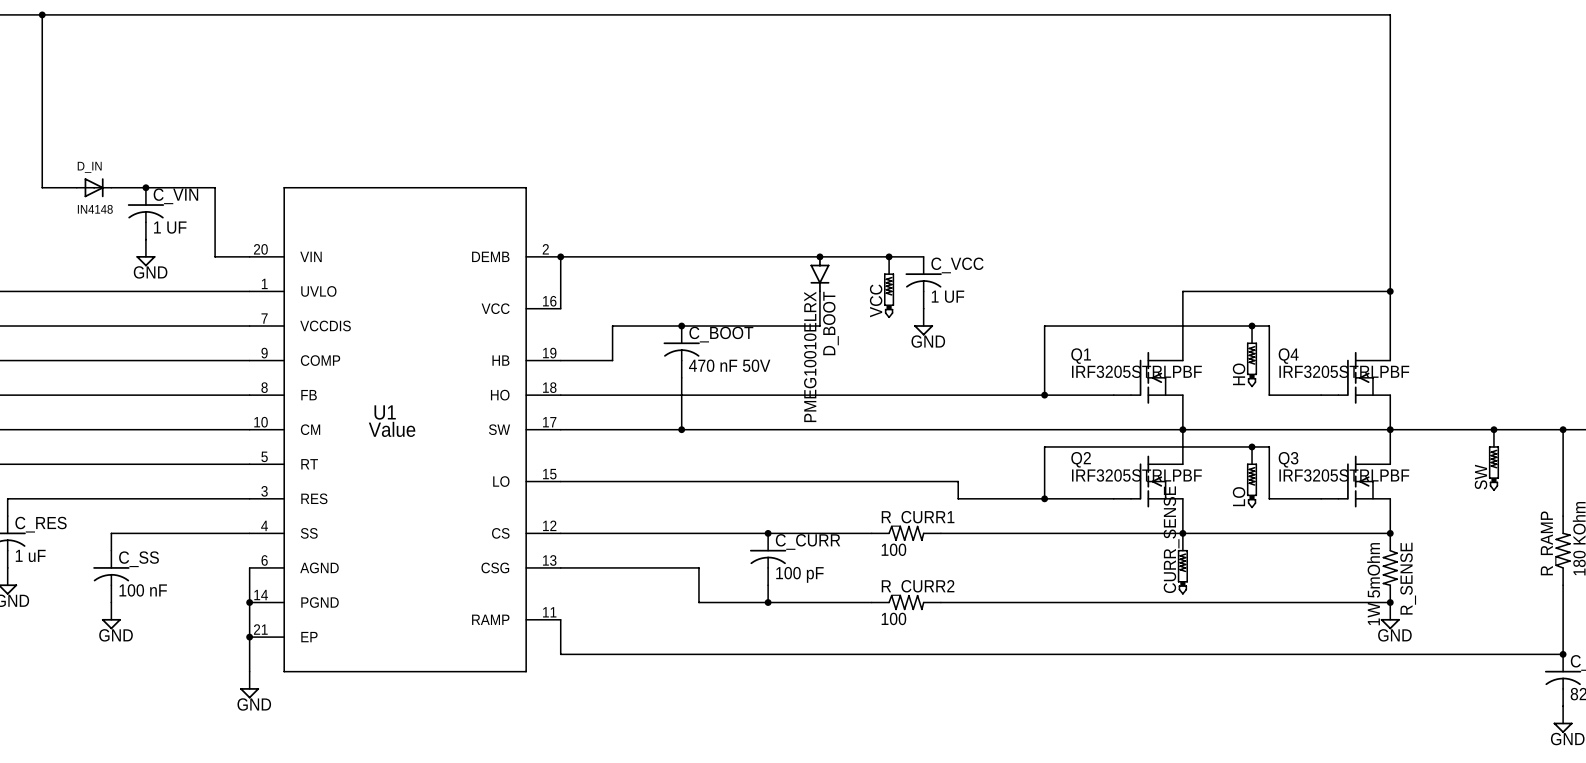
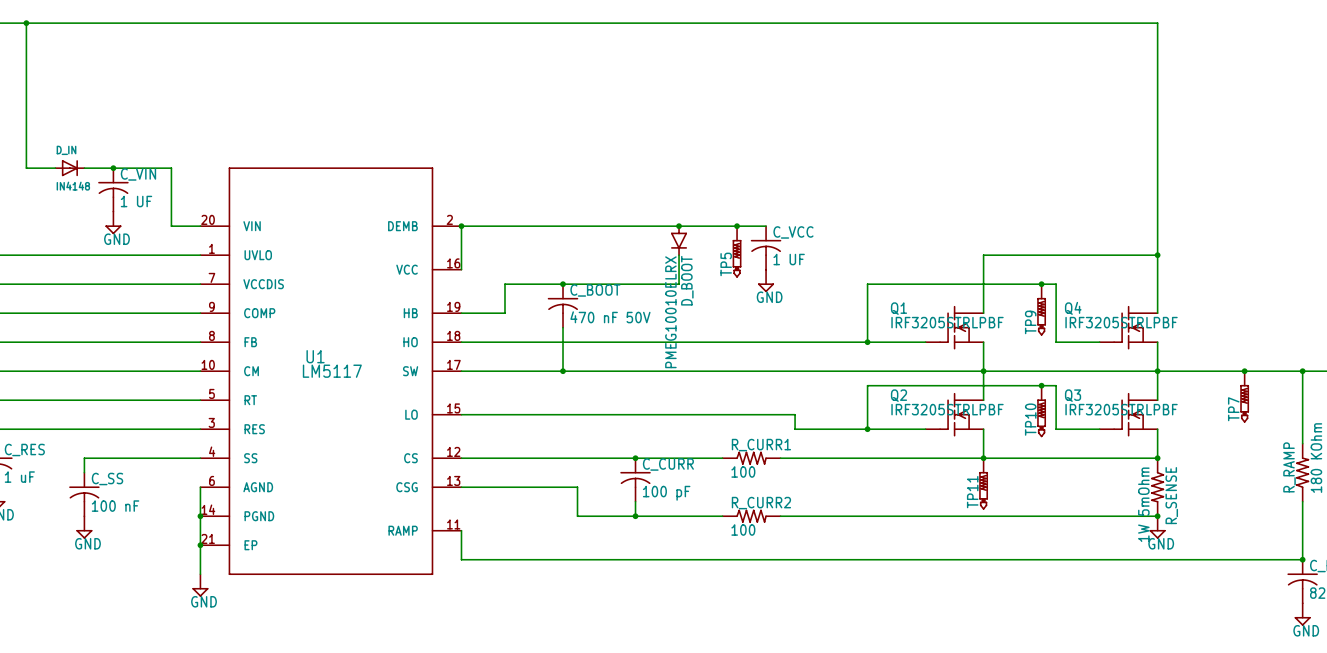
VCC name: VCC (876, 300) -> TP5 (726, 264)
HO name: HO (1239, 374) -> TP9 (1030, 322)
U1 value: Value (392, 429) -> LM5117 (332, 371)
SW name: SW (1481, 477) -> TP7 (1233, 409)
LO name: LO (1239, 496) -> TP10 (1030, 419)
CURR_SENSE name: CURR_SENSE (1171, 539) -> TP11 (972, 492)

